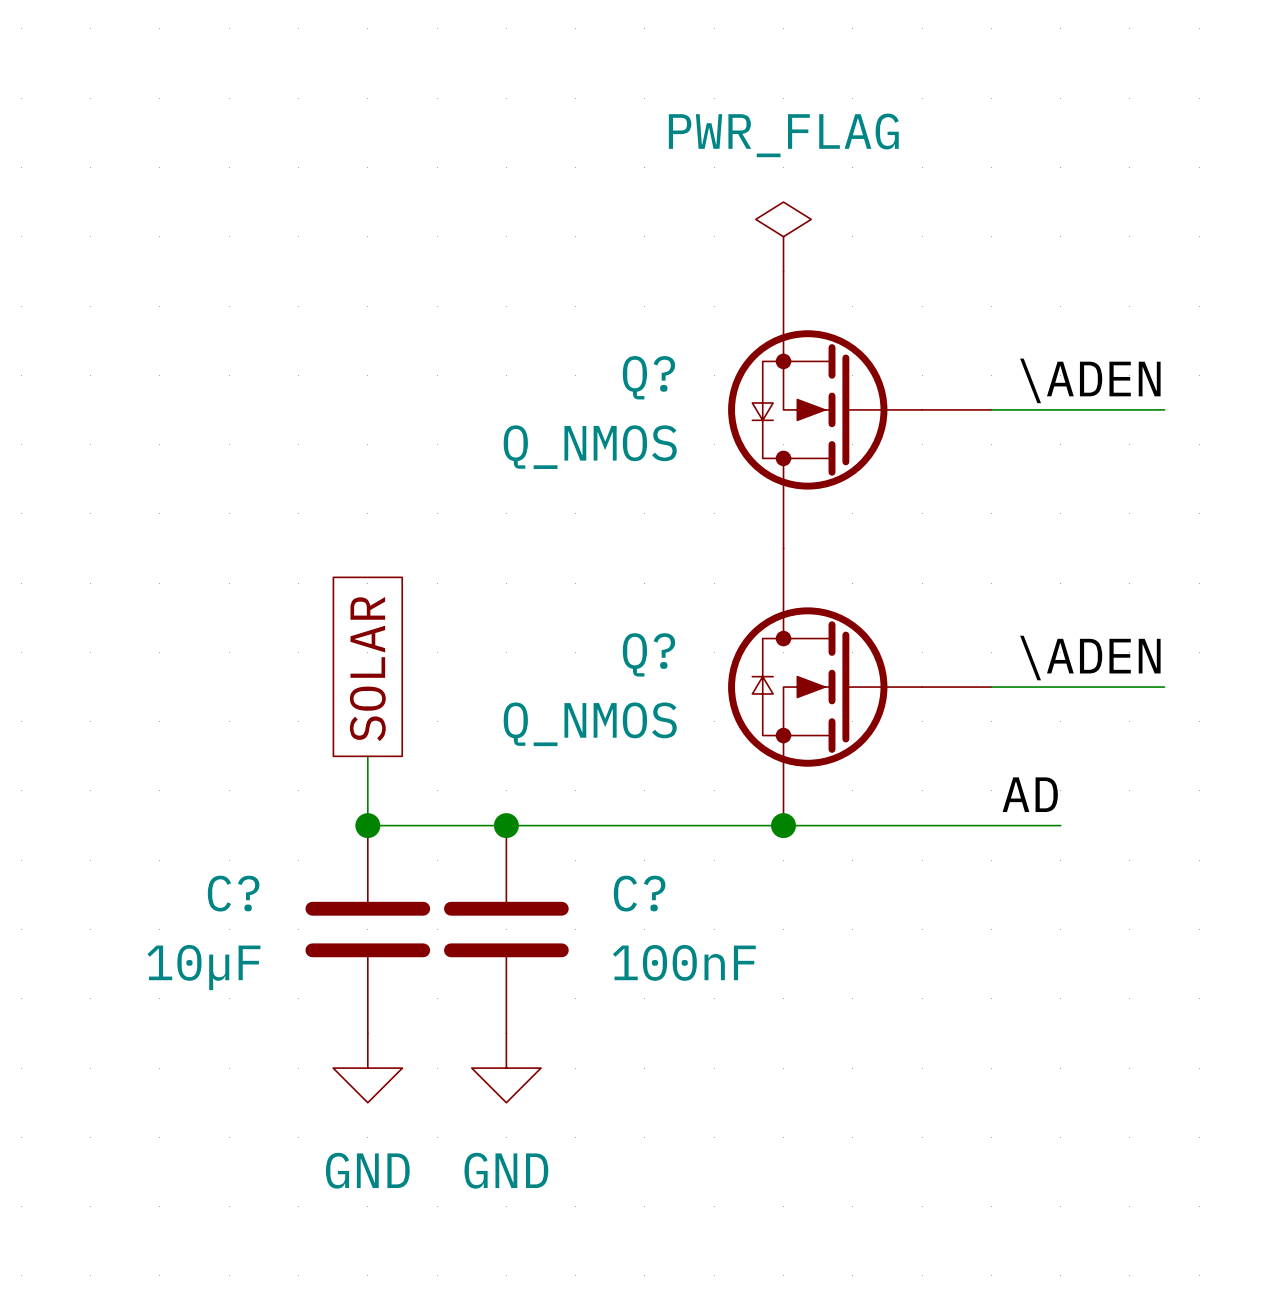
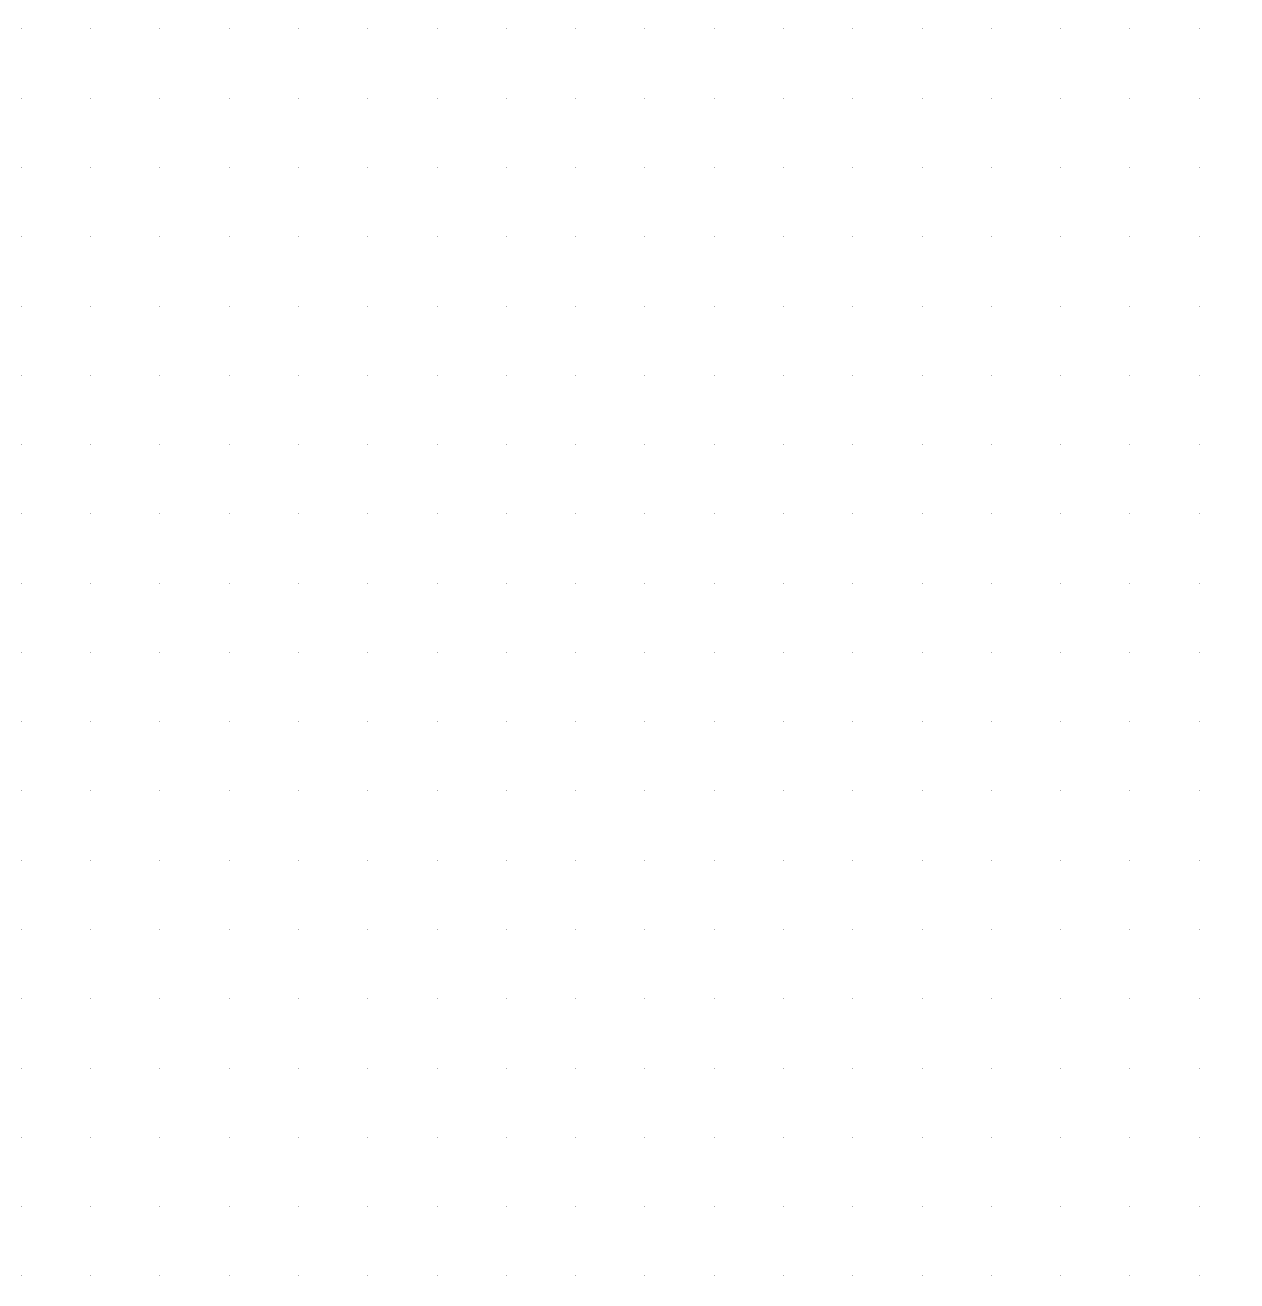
power symbol: PWR_FLAG (783, 236) -> none
label: \ADEN (1090, 380) -> none
Q?: Q_NMOS (859, 409) -> none
wire: (991, 409) (1164, 409) -> none
label: \ADEN (1090, 658) -> none
global label: SOLAR (367, 669) -> none
Q?: Q_NMOS (859, 687) -> none
wire: (991, 687) (1164, 687) -> none
wire: (367, 756) (367, 825) (1060, 825) -> none
label: AD (1030, 794) -> none
junction: (367, 825) -> none
junction: (506, 825) -> none
junction: (783, 825) -> none
C?: 10µF (367, 929) -> none
C?: 100nF (506, 929) -> none
power symbol: GND (367, 1068) -> none
power symbol: GND (506, 1068) -> none

